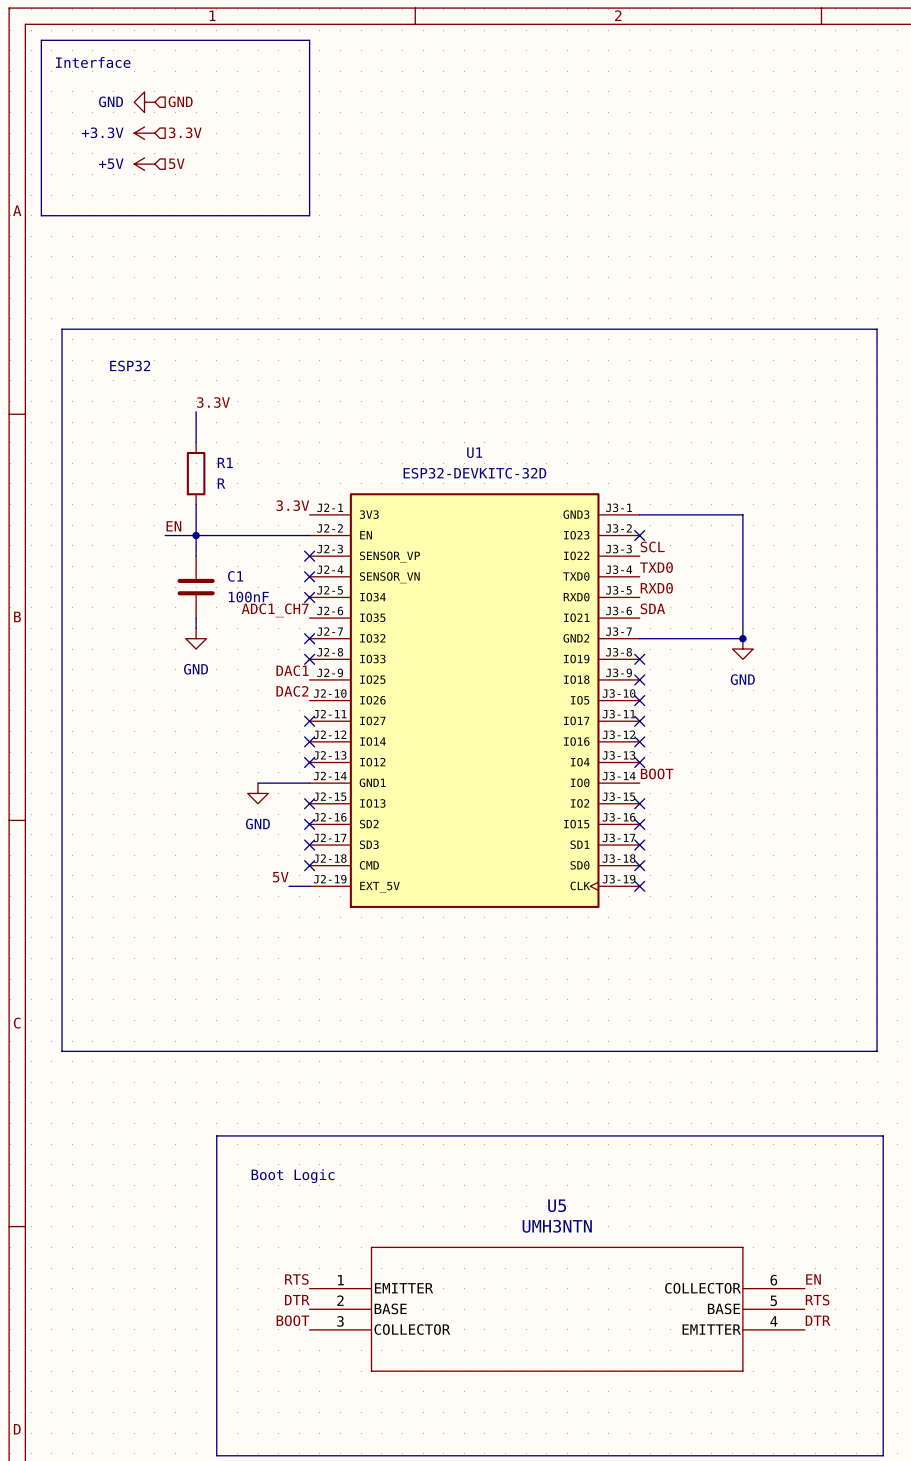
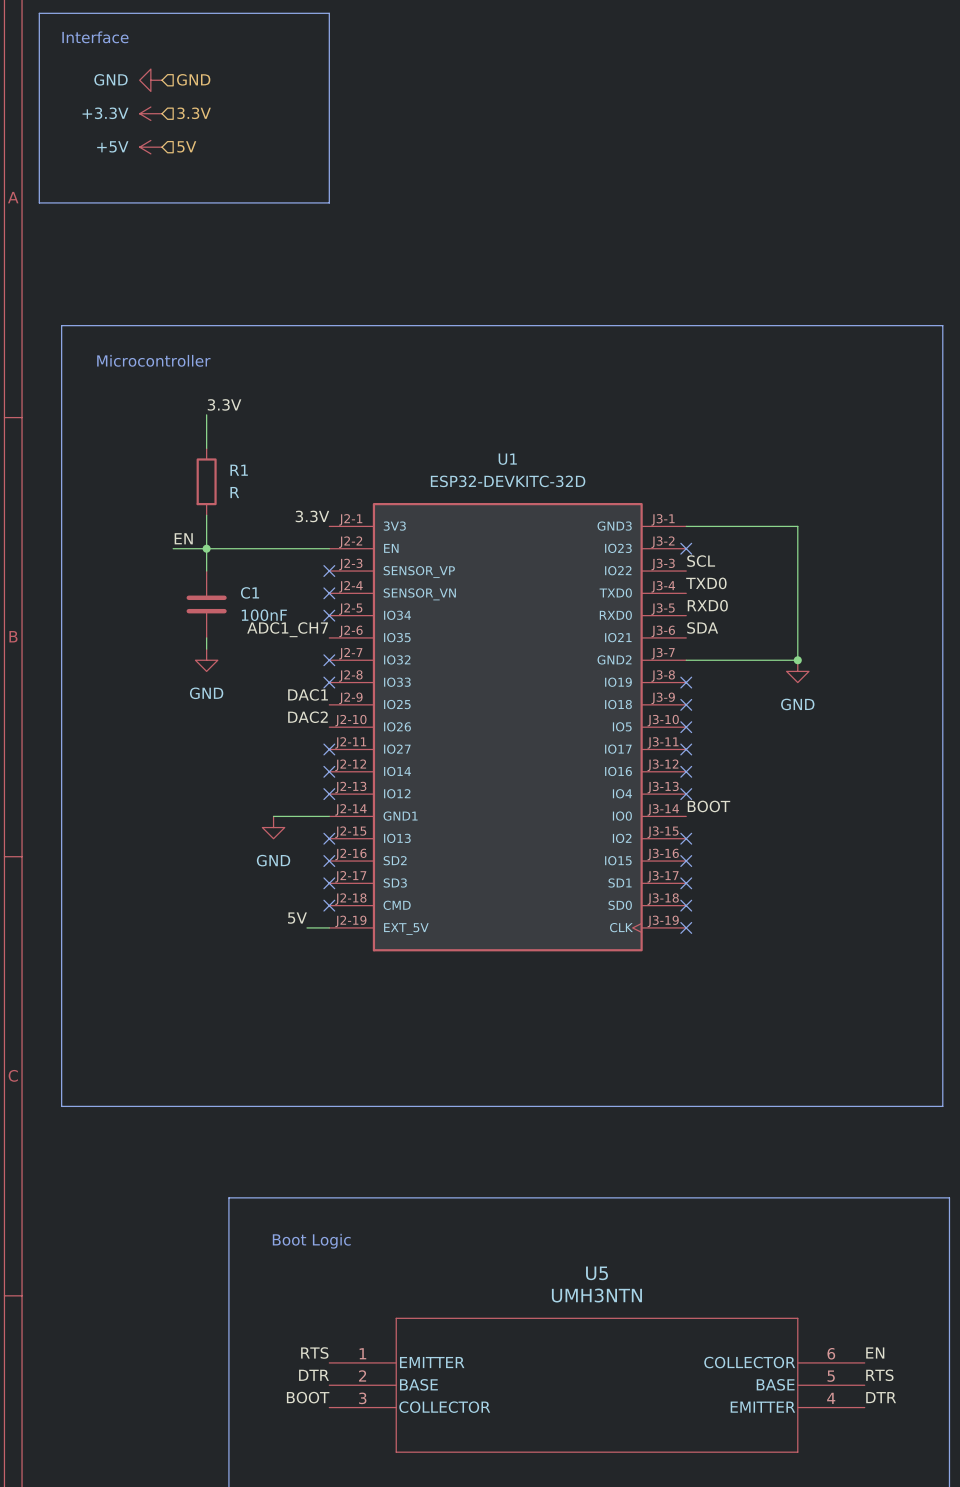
text: none -> Microcontroller (153, 360)
text: ESP32 (130, 365) -> none

